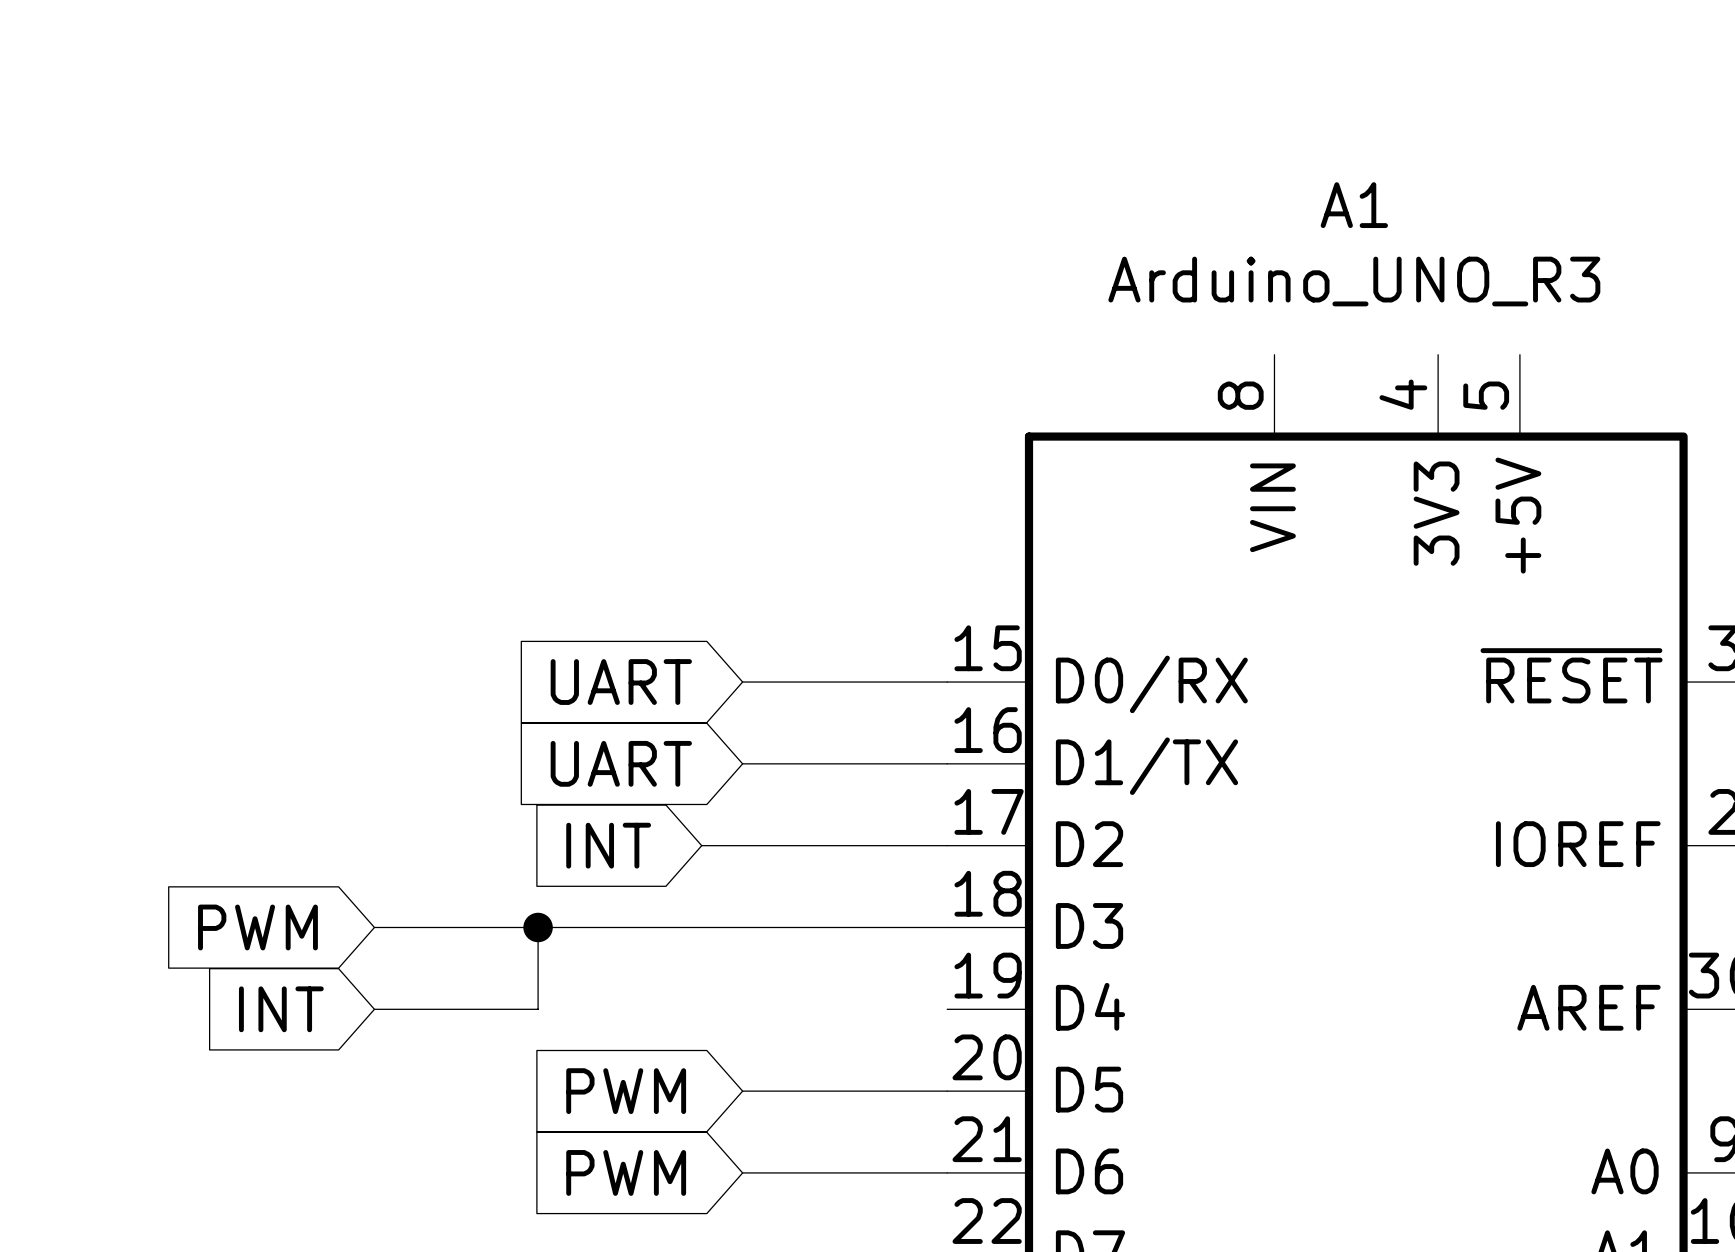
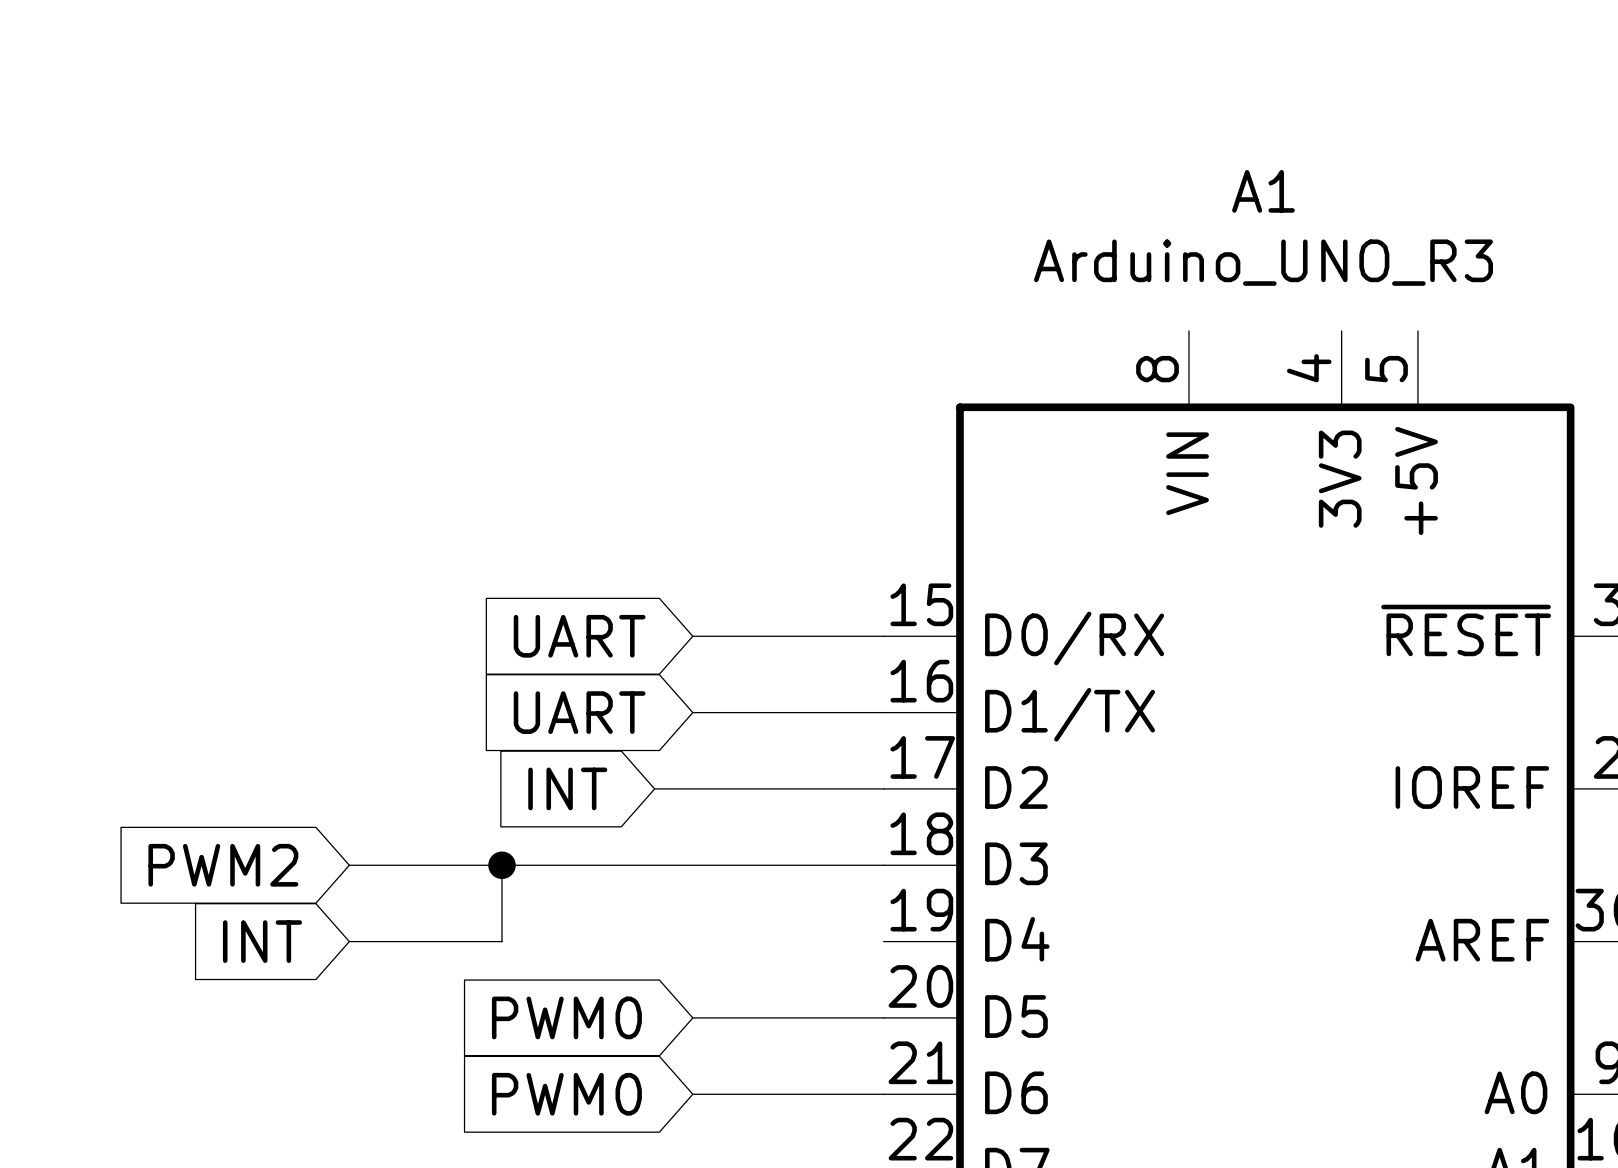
global label: PWM (257, 927) -> PWM2 (223, 865)
global label: PWM (626, 1091) -> PWM0 (566, 1017)
global label: PWM (626, 1172) -> PWM0 (566, 1094)

